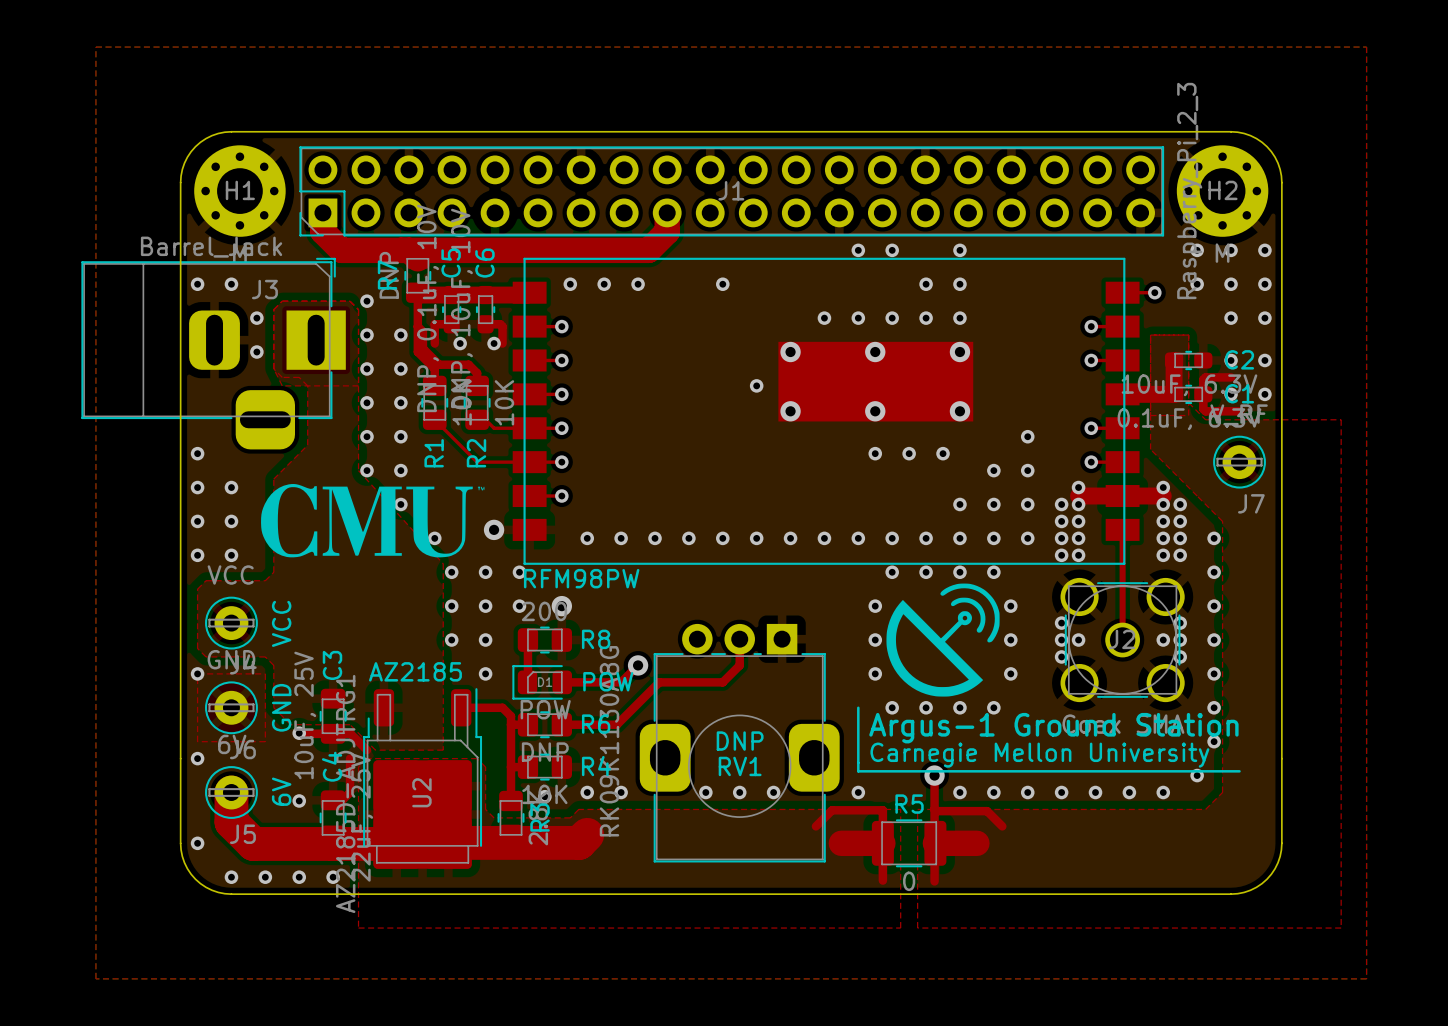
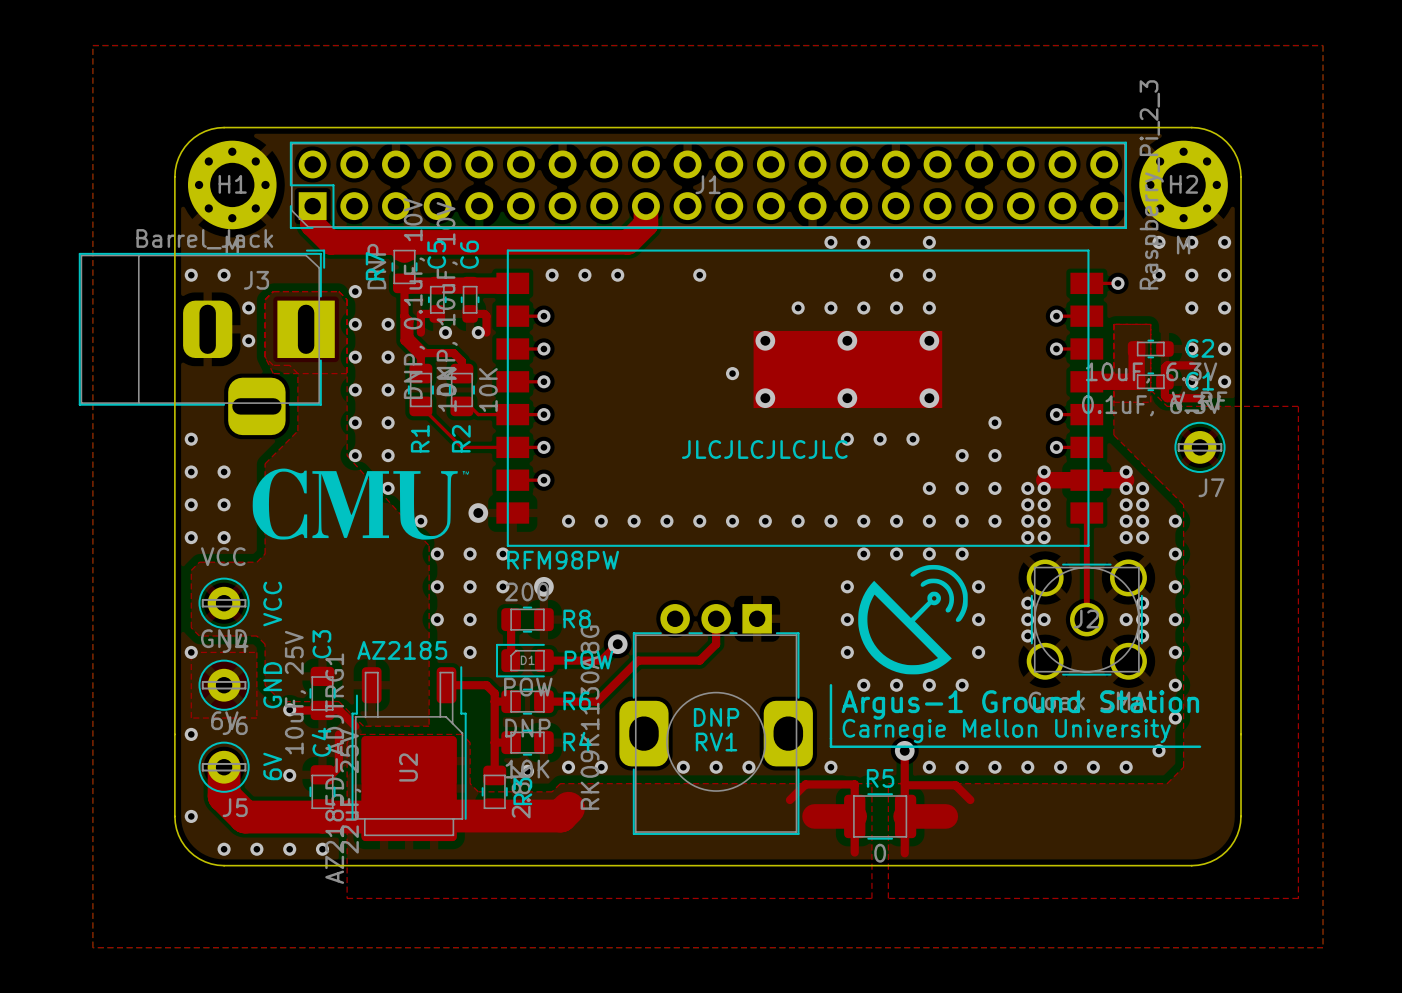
text: none -> JLCJLCJLCJLC (764, 449)

